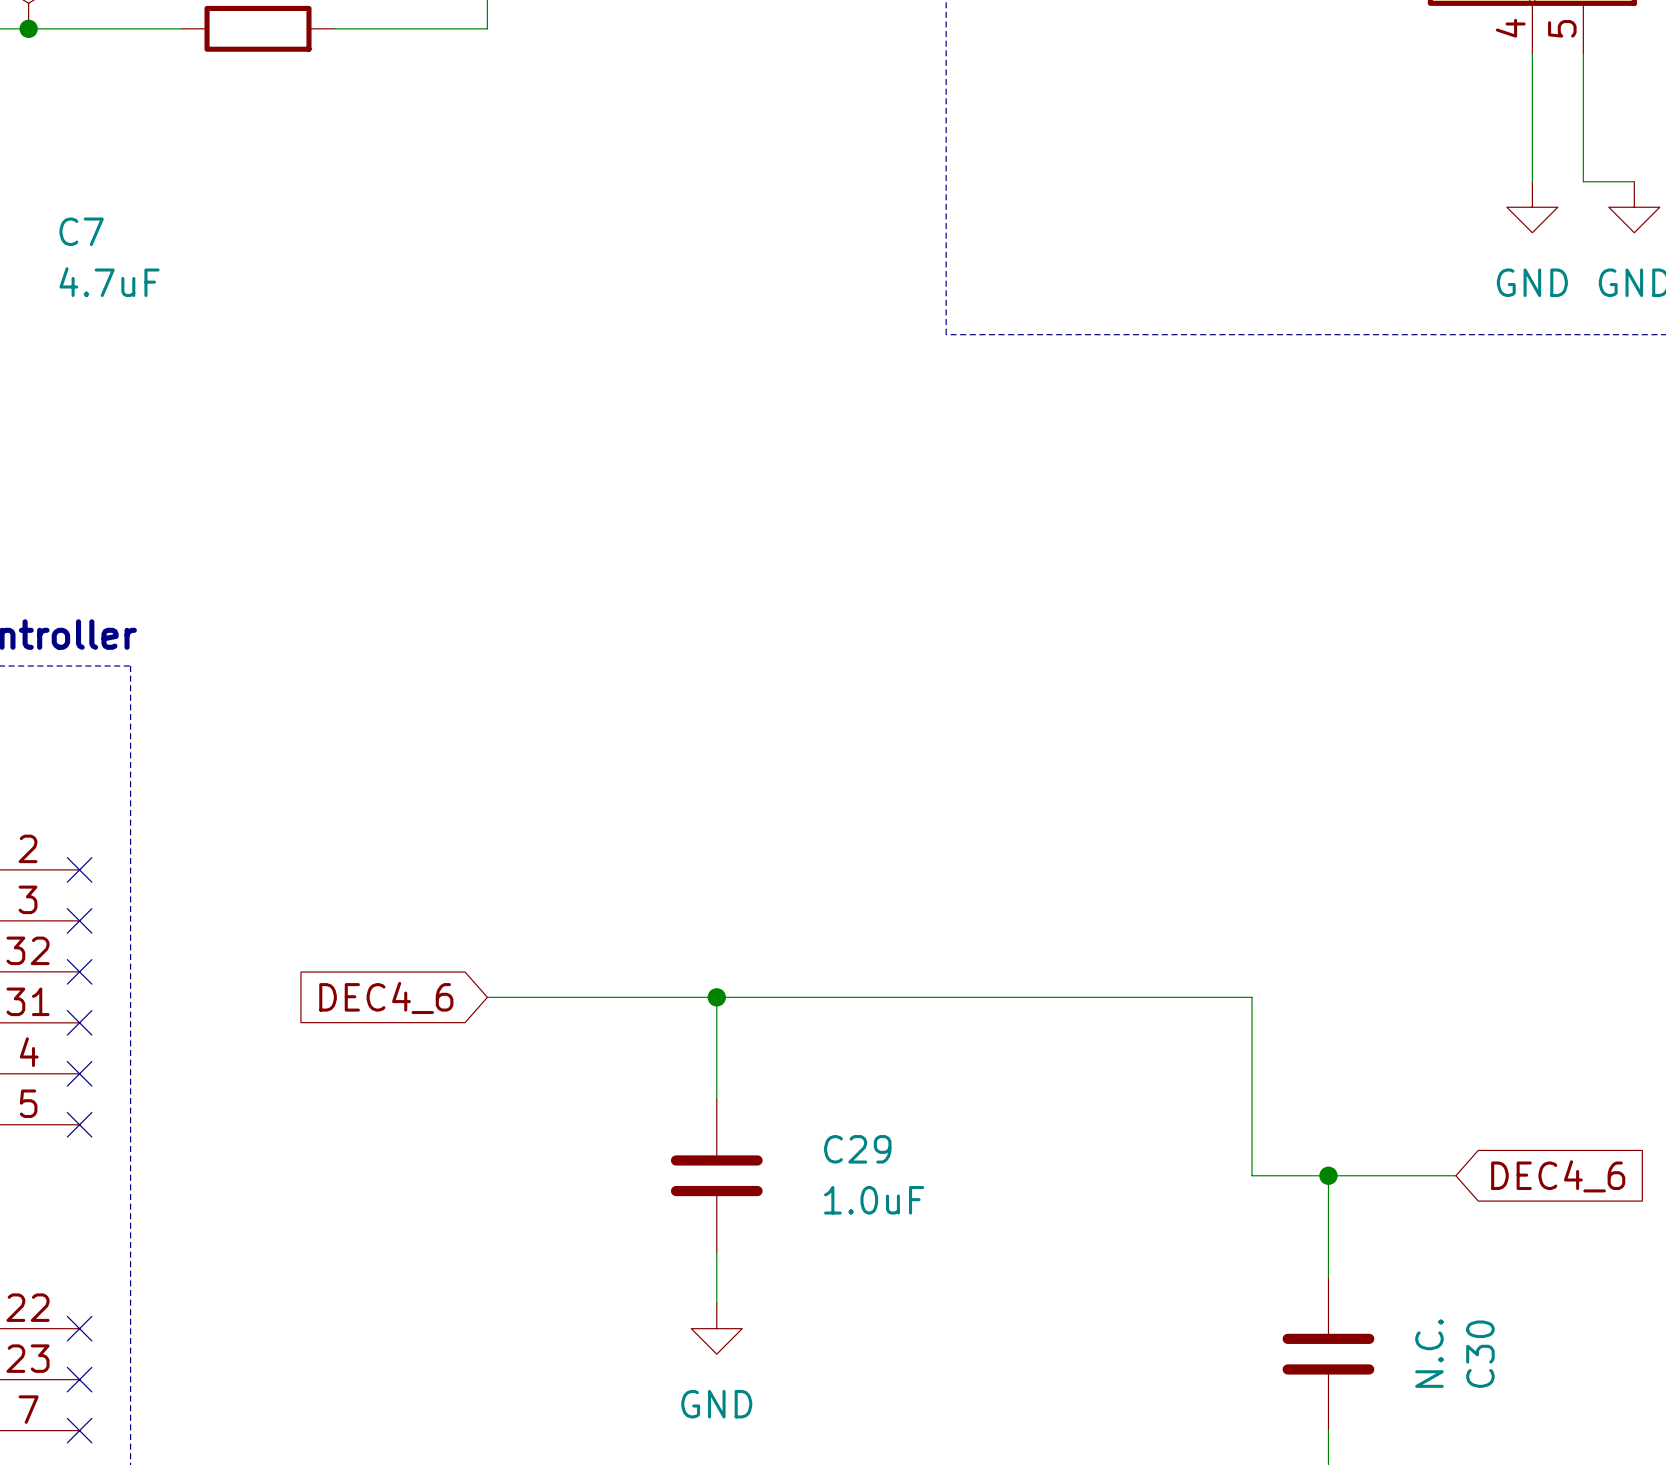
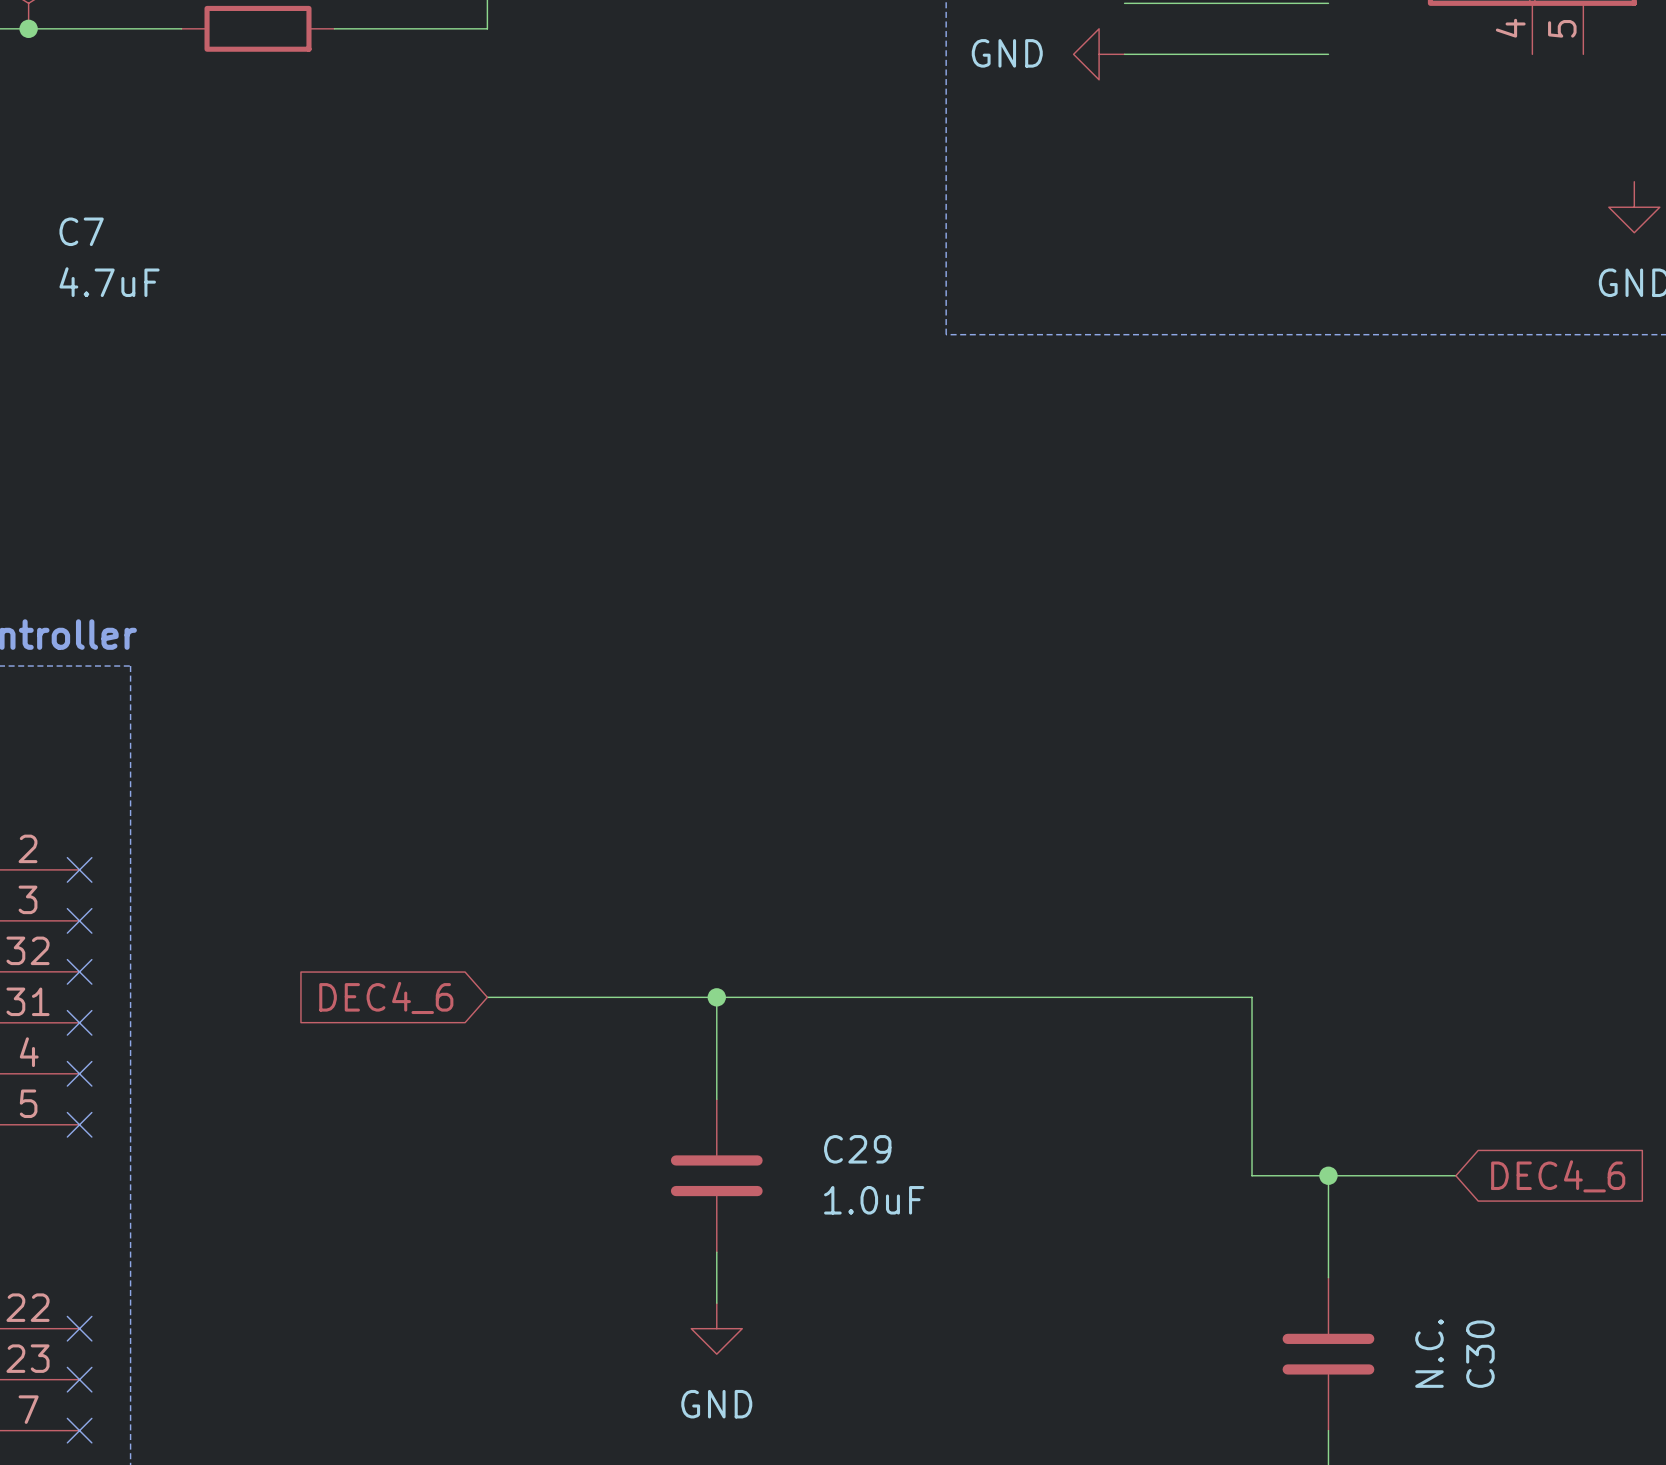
wire: none -> (1124, 3) (1328, 3)
wire: none -> (1124, 54) (1328, 54)
wire: (1532, 54) (1532, 181) -> none
wire: (1583, 54) (1583, 181) (1634, 181) -> none
power symbol rotation: 0° (1532, 207) -> 90° clockwise (1099, 54)
power symbol position: GND (1532, 207) -> GND (1099, 54)

